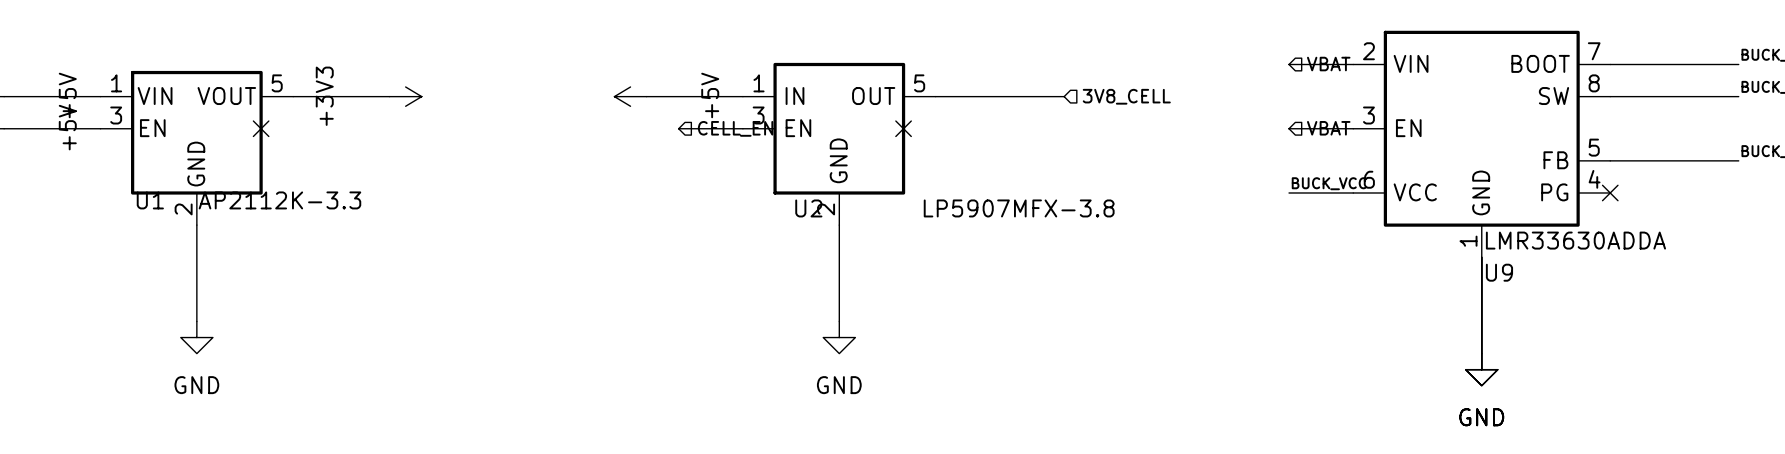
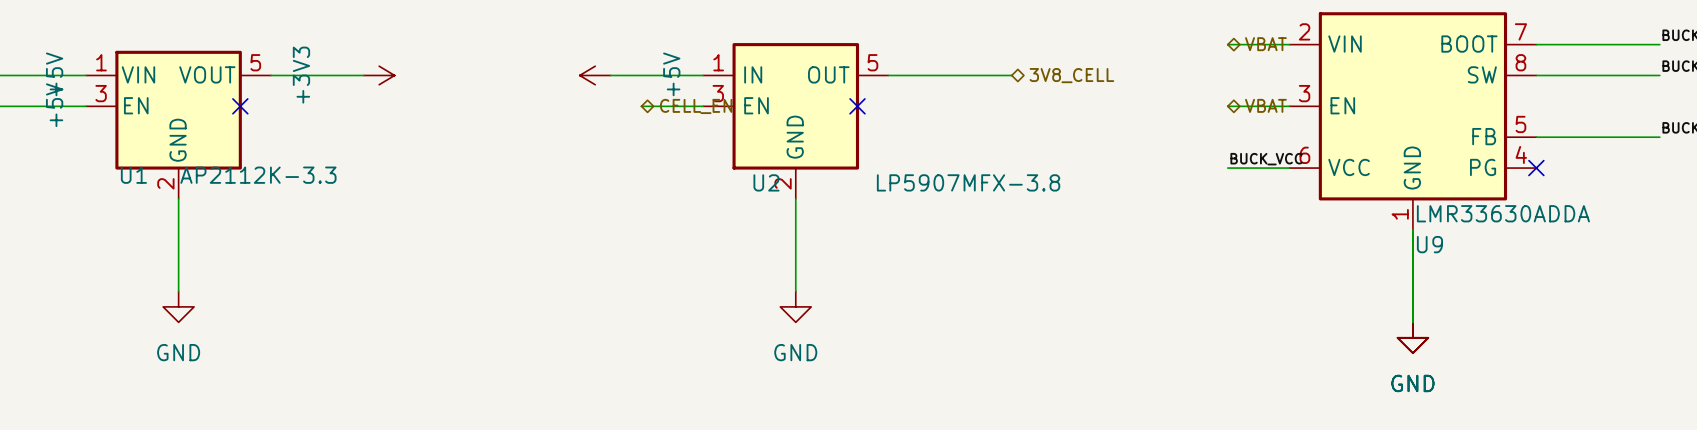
hierarchical label shape: input (1328, 64) -> bidirectional (1265, 44)
hierarchical label shape: input (1126, 96) -> bidirectional (1071, 75)
hierarchical label shape: input (735, 128) -> bidirectional (696, 106)
hierarchical label shape: input (1328, 128) -> bidirectional (1265, 105)

